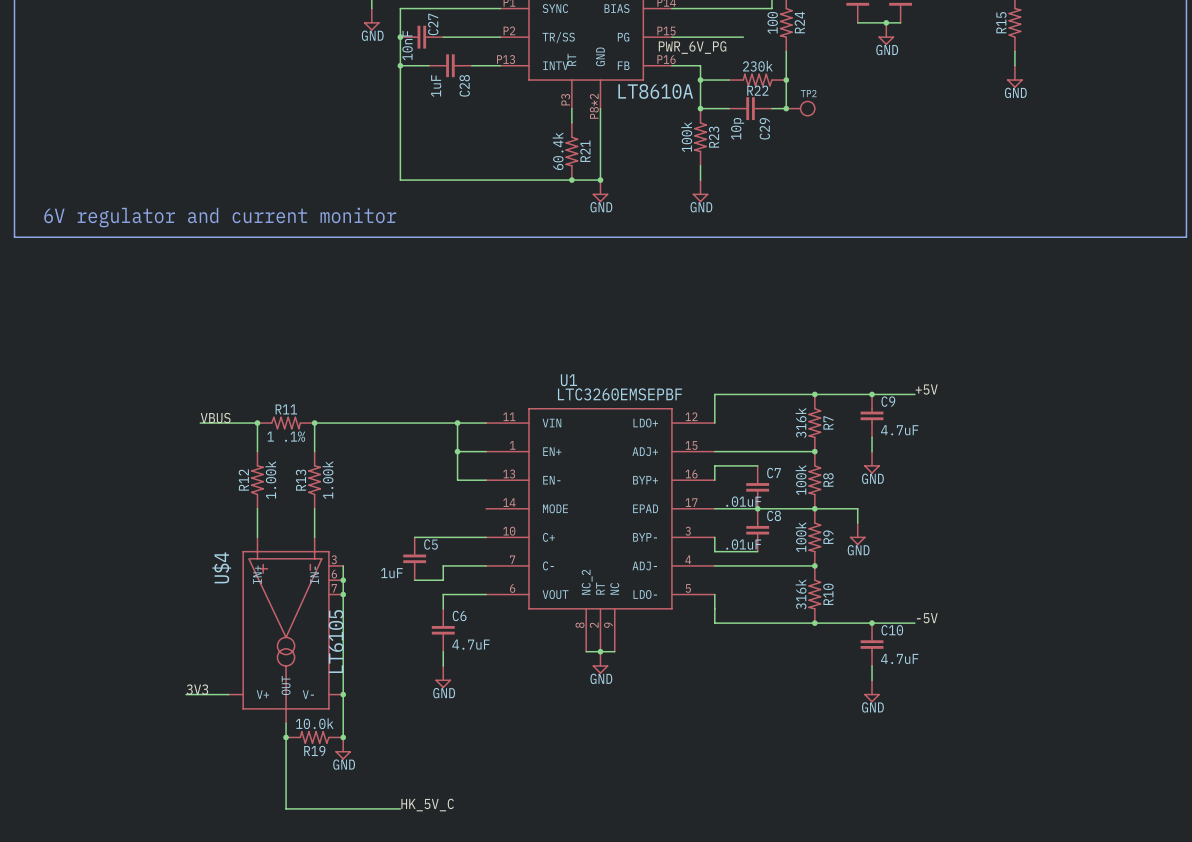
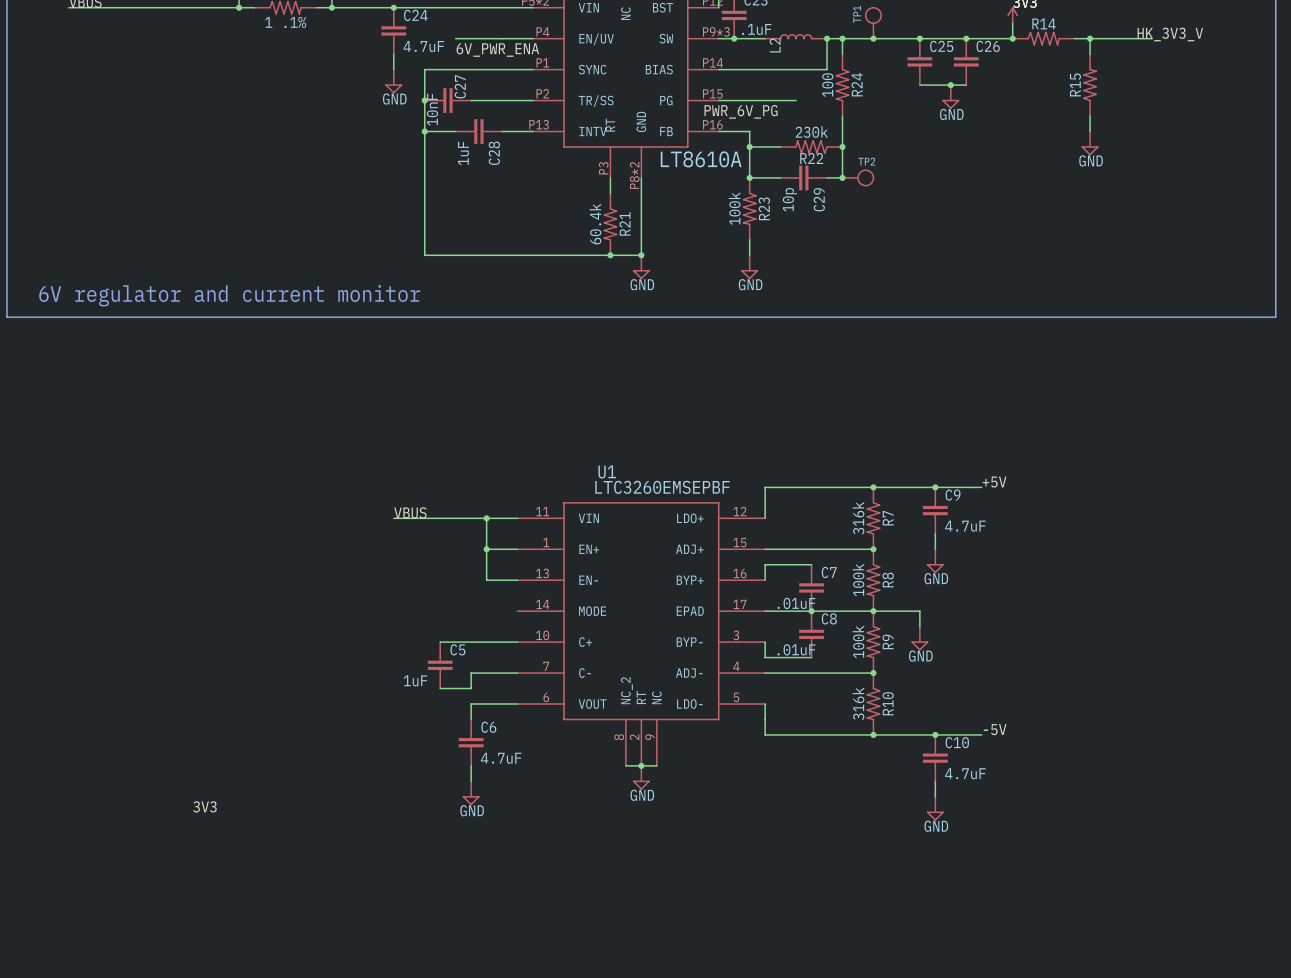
label: VBUS (215, 418) -> none
label: none -> VBUS (410, 512)
wire: (200, 423) (257, 423) (257, 451) -> none
junction: (257, 423) -> none
R11: 1 .1% (286, 423) -> none
junction: (314, 423) -> none
wire: (371, 423) (314, 423) (314, 451) -> none
R12: 1.00k (257, 480) -> none
R13: 1.00k (314, 480) -> none
wire: (257, 508) (257, 537) -> none
wire: (314, 508) (314, 537) -> none
wire: (343, 565) (343, 737) -> none
junction: (343, 580) -> none
junction: (343, 594) -> none
U$4: LT6105 (286, 630) -> none
wire: (186, 694) (228, 694) -> none
junction: (343, 694) -> none
wire: (286, 723) (286, 808) (400, 808) -> none
junction: (286, 737) -> none
R19: 10.0k (314, 737) -> none
junction: (343, 737) -> none
power symbol: GND (343, 748) -> none
label: HK_5V_C (427, 805) -> none

